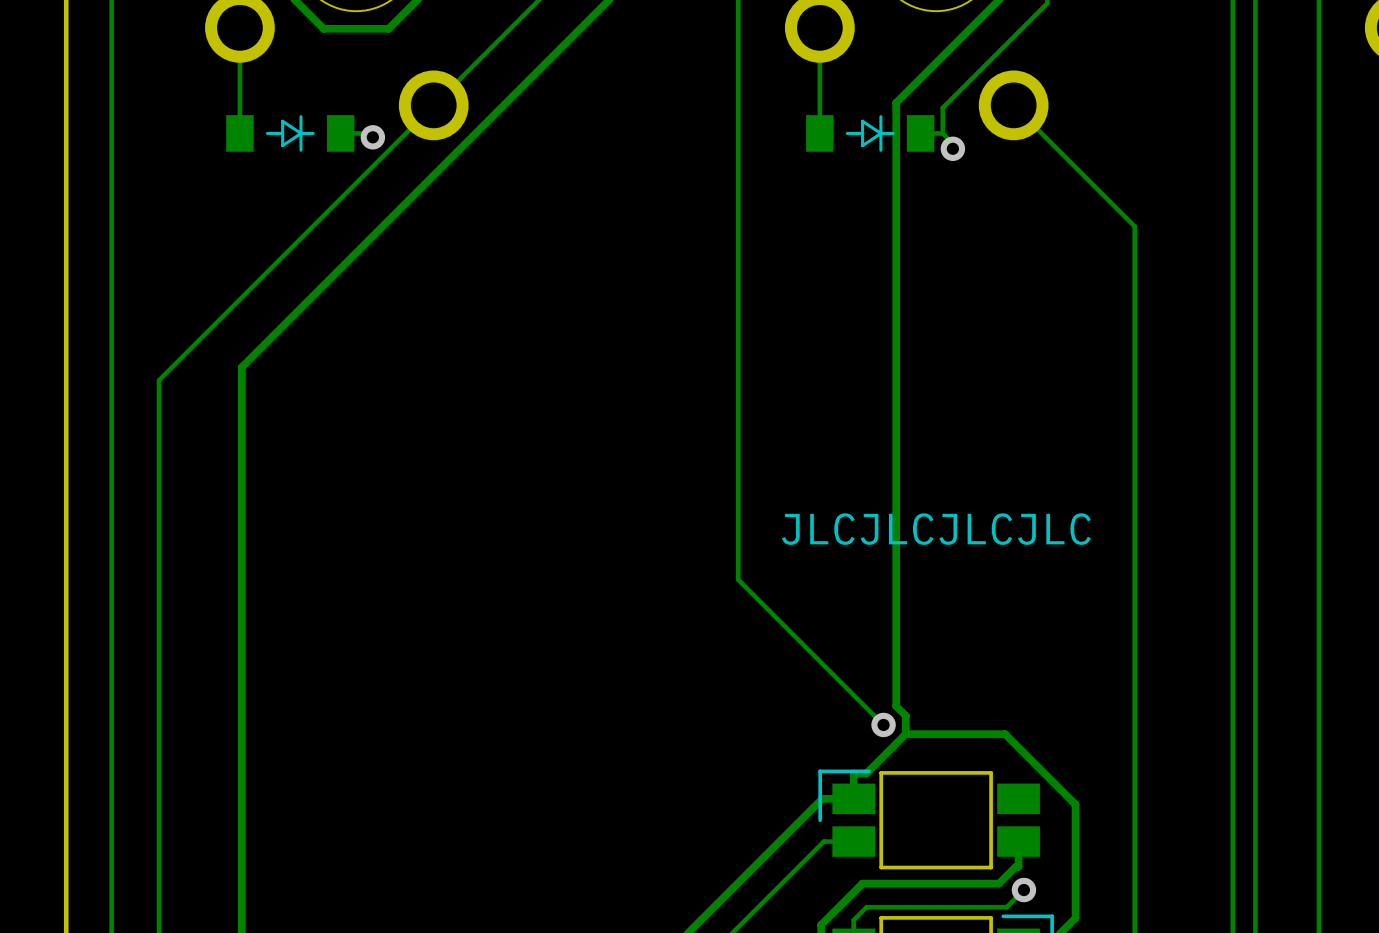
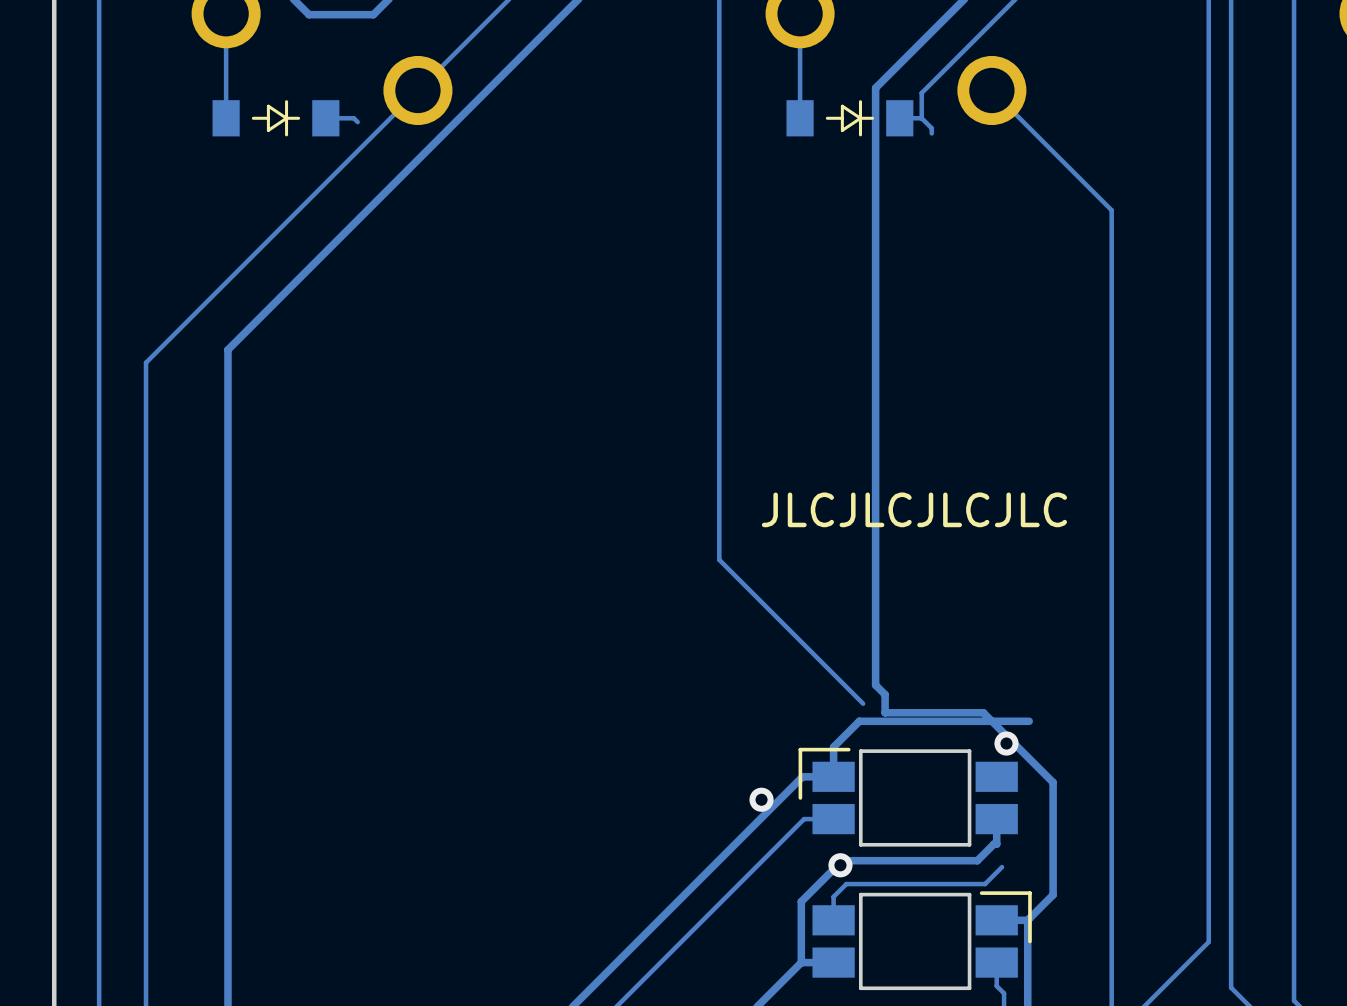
via: (372, 137) -> none
via: (952, 148) -> none
via: (883, 724) -> none
track: (905, 734) (866, 773) (853, 773) -> (1029, 721) (859, 721) (833, 747) (833, 751)
via: none -> (1006, 743)
via: none -> (761, 799)
via: none -> (840, 865)
via: (1023, 890) -> none

